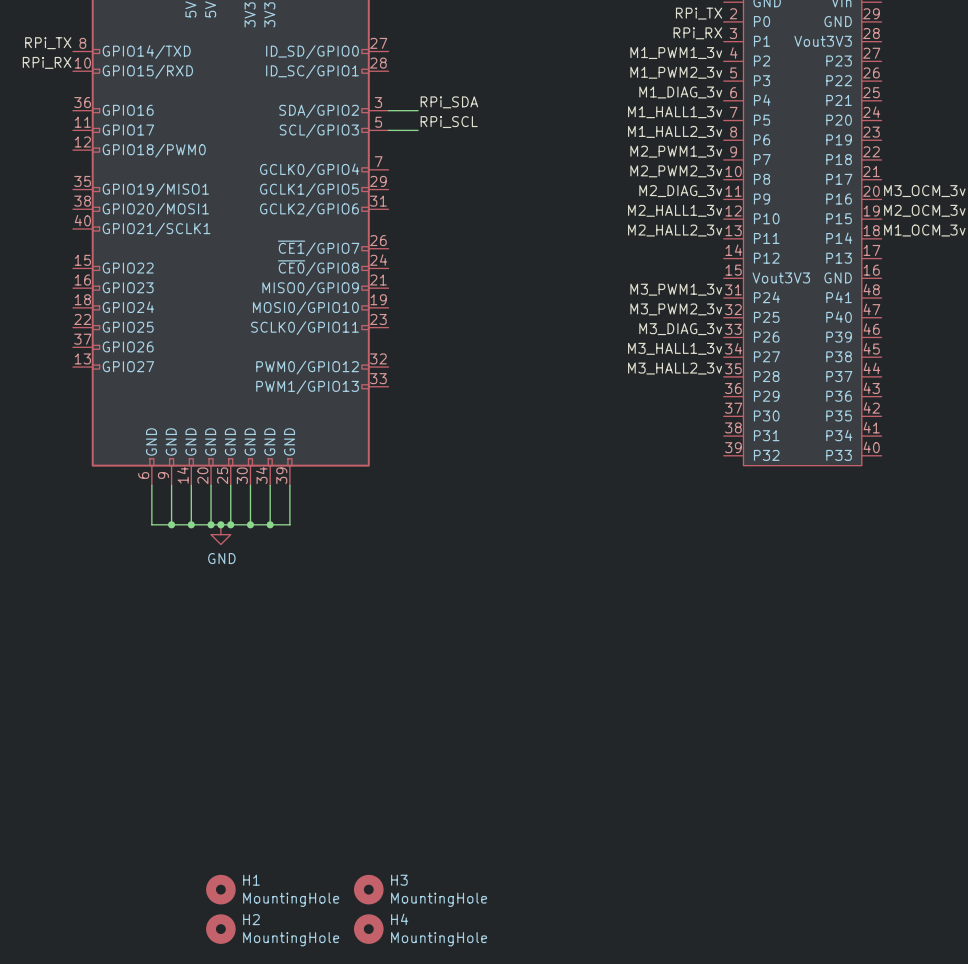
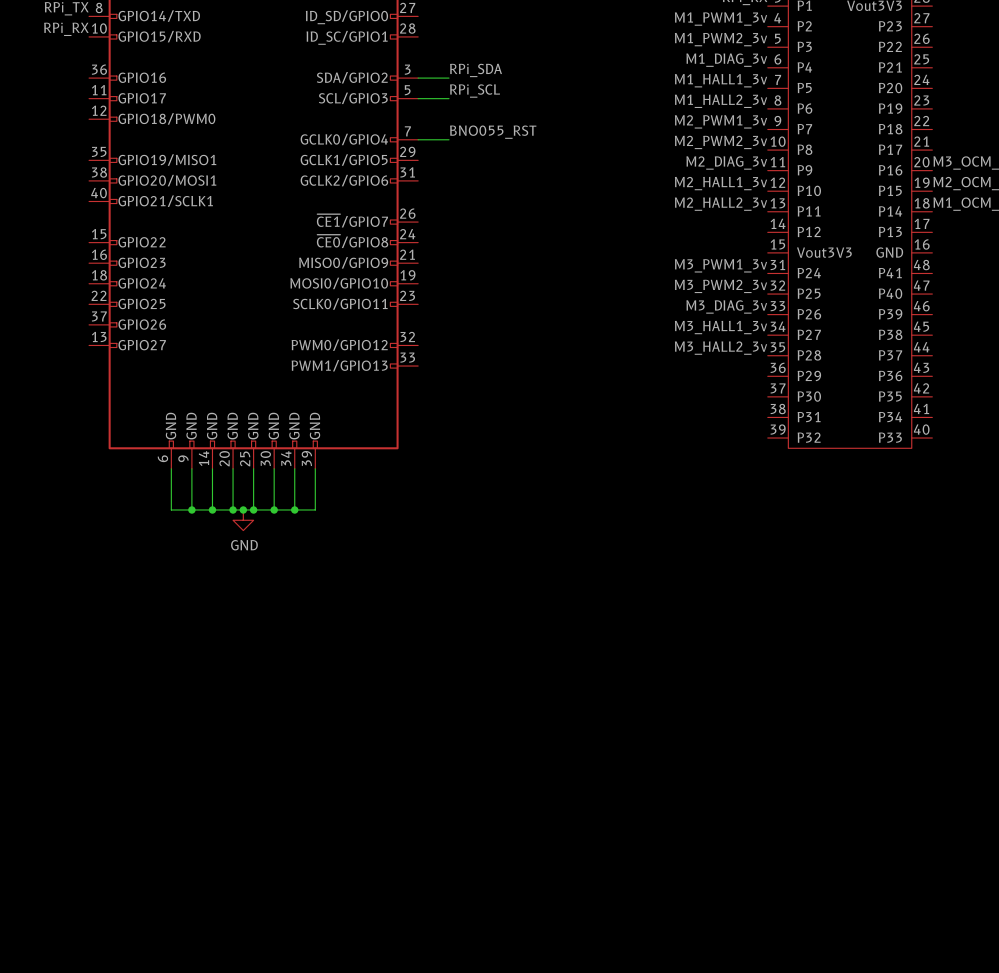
label: none -> BNO055_RST (493, 132)
wire: none -> (418, 139) (448, 139)
H1: MountingHole (220, 889) -> none
H3: MountingHole (368, 889) -> none
H2: MountingHole (220, 929) -> none
H4: MountingHole (368, 929) -> none

